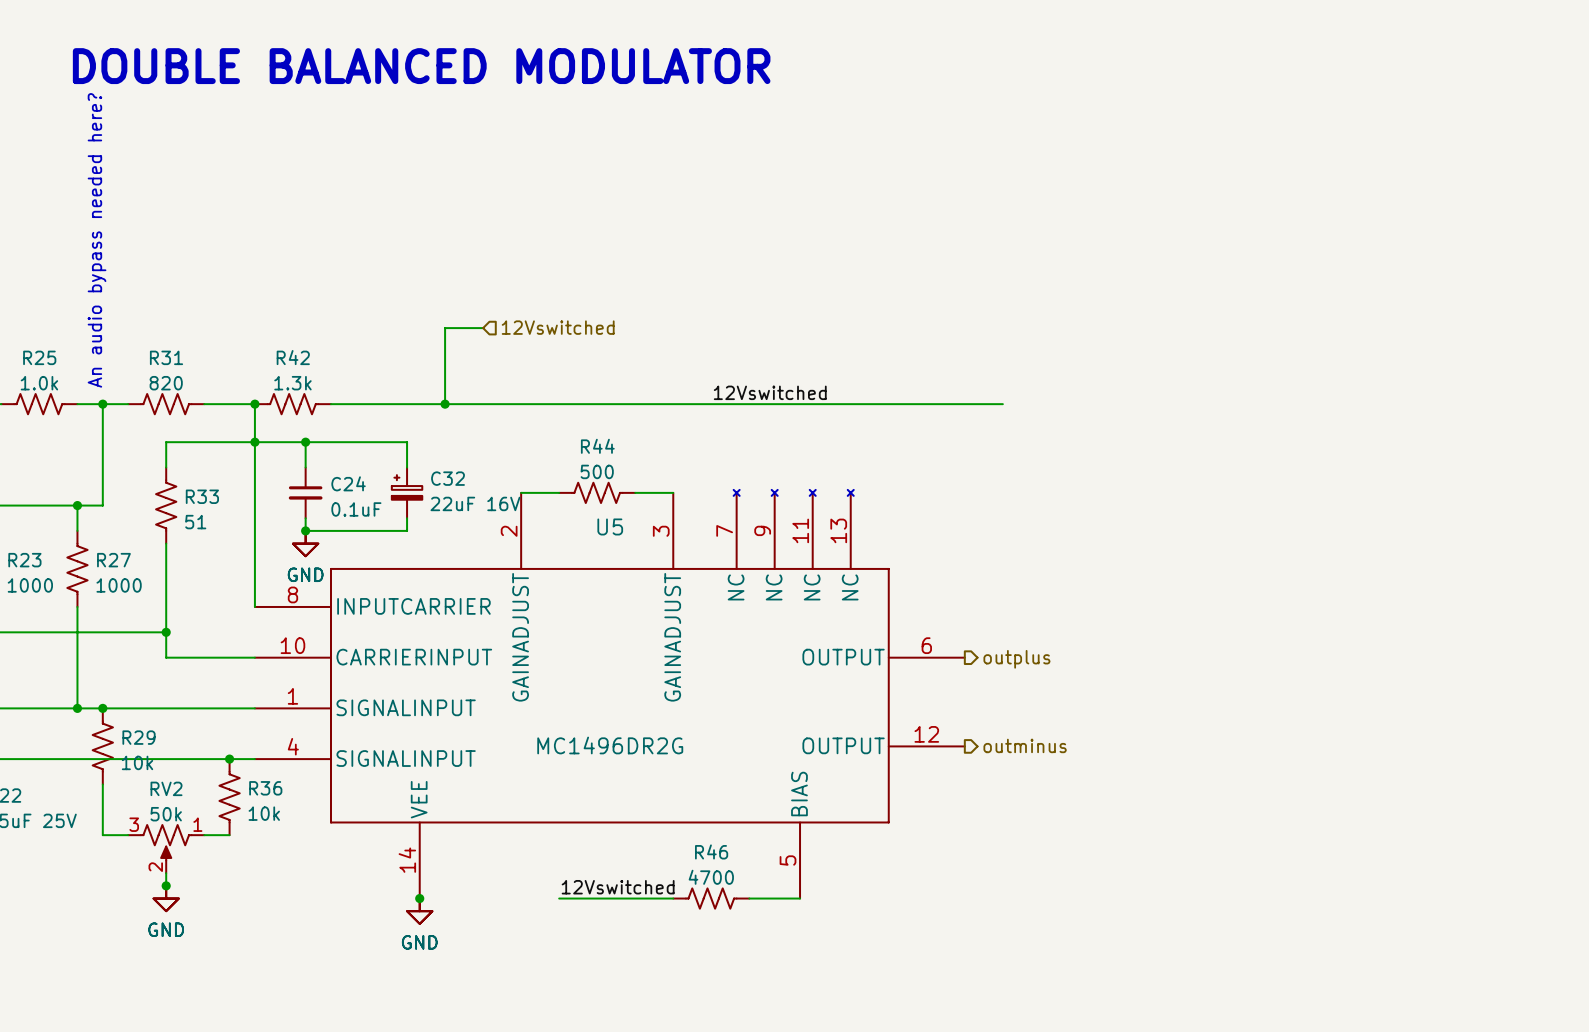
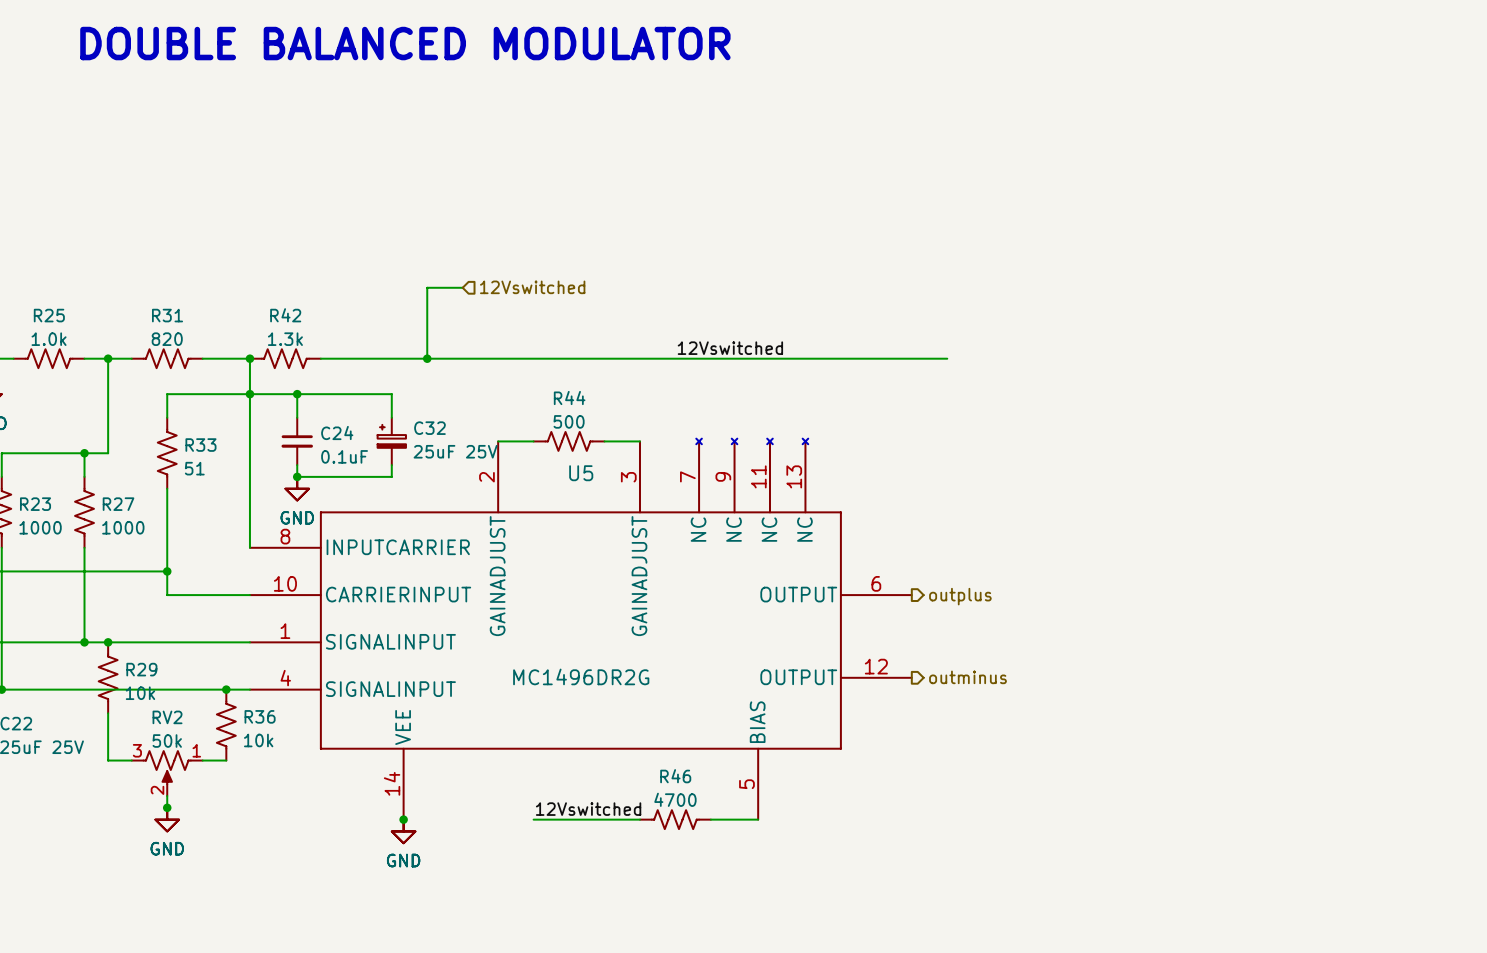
text: An audio bypass needed here? (97, 240) -> none
C32 value: 22uF 16V (475, 503) -> 25uF 25V (455, 451)

